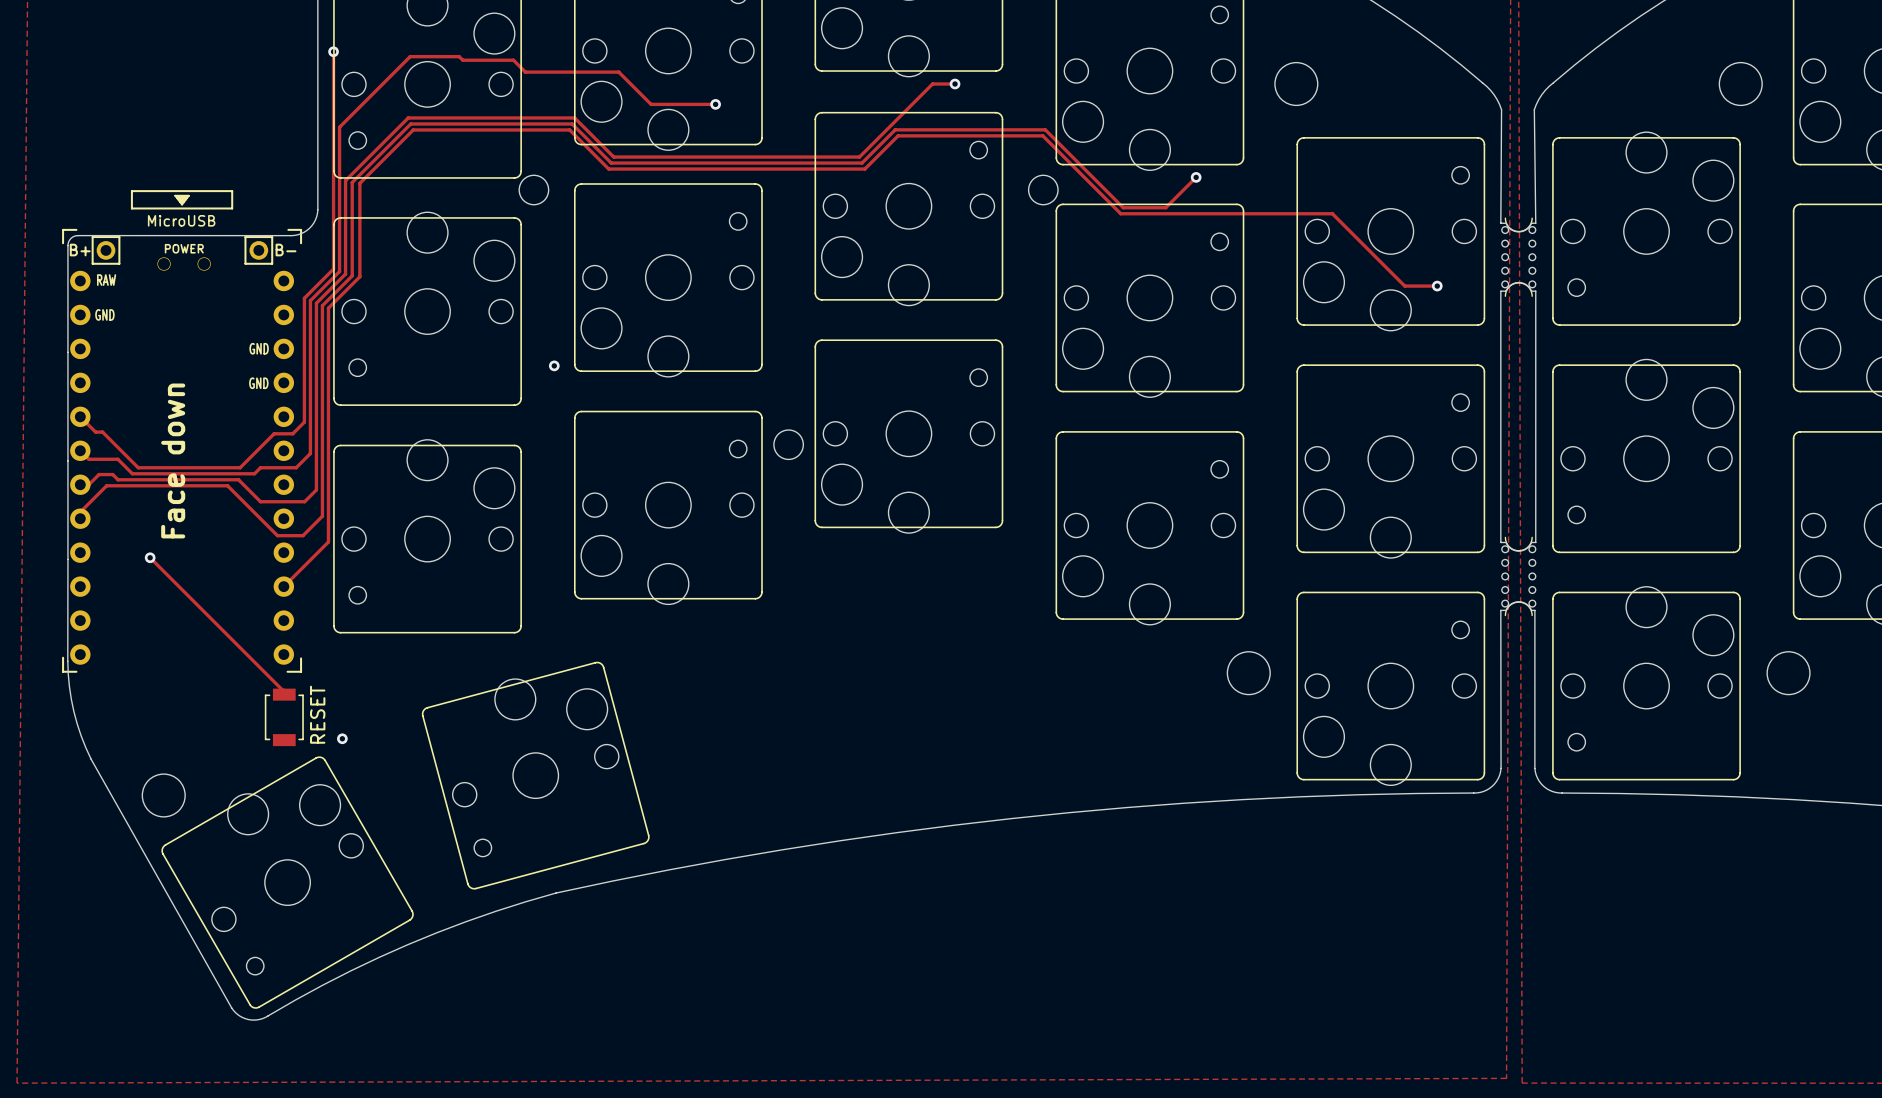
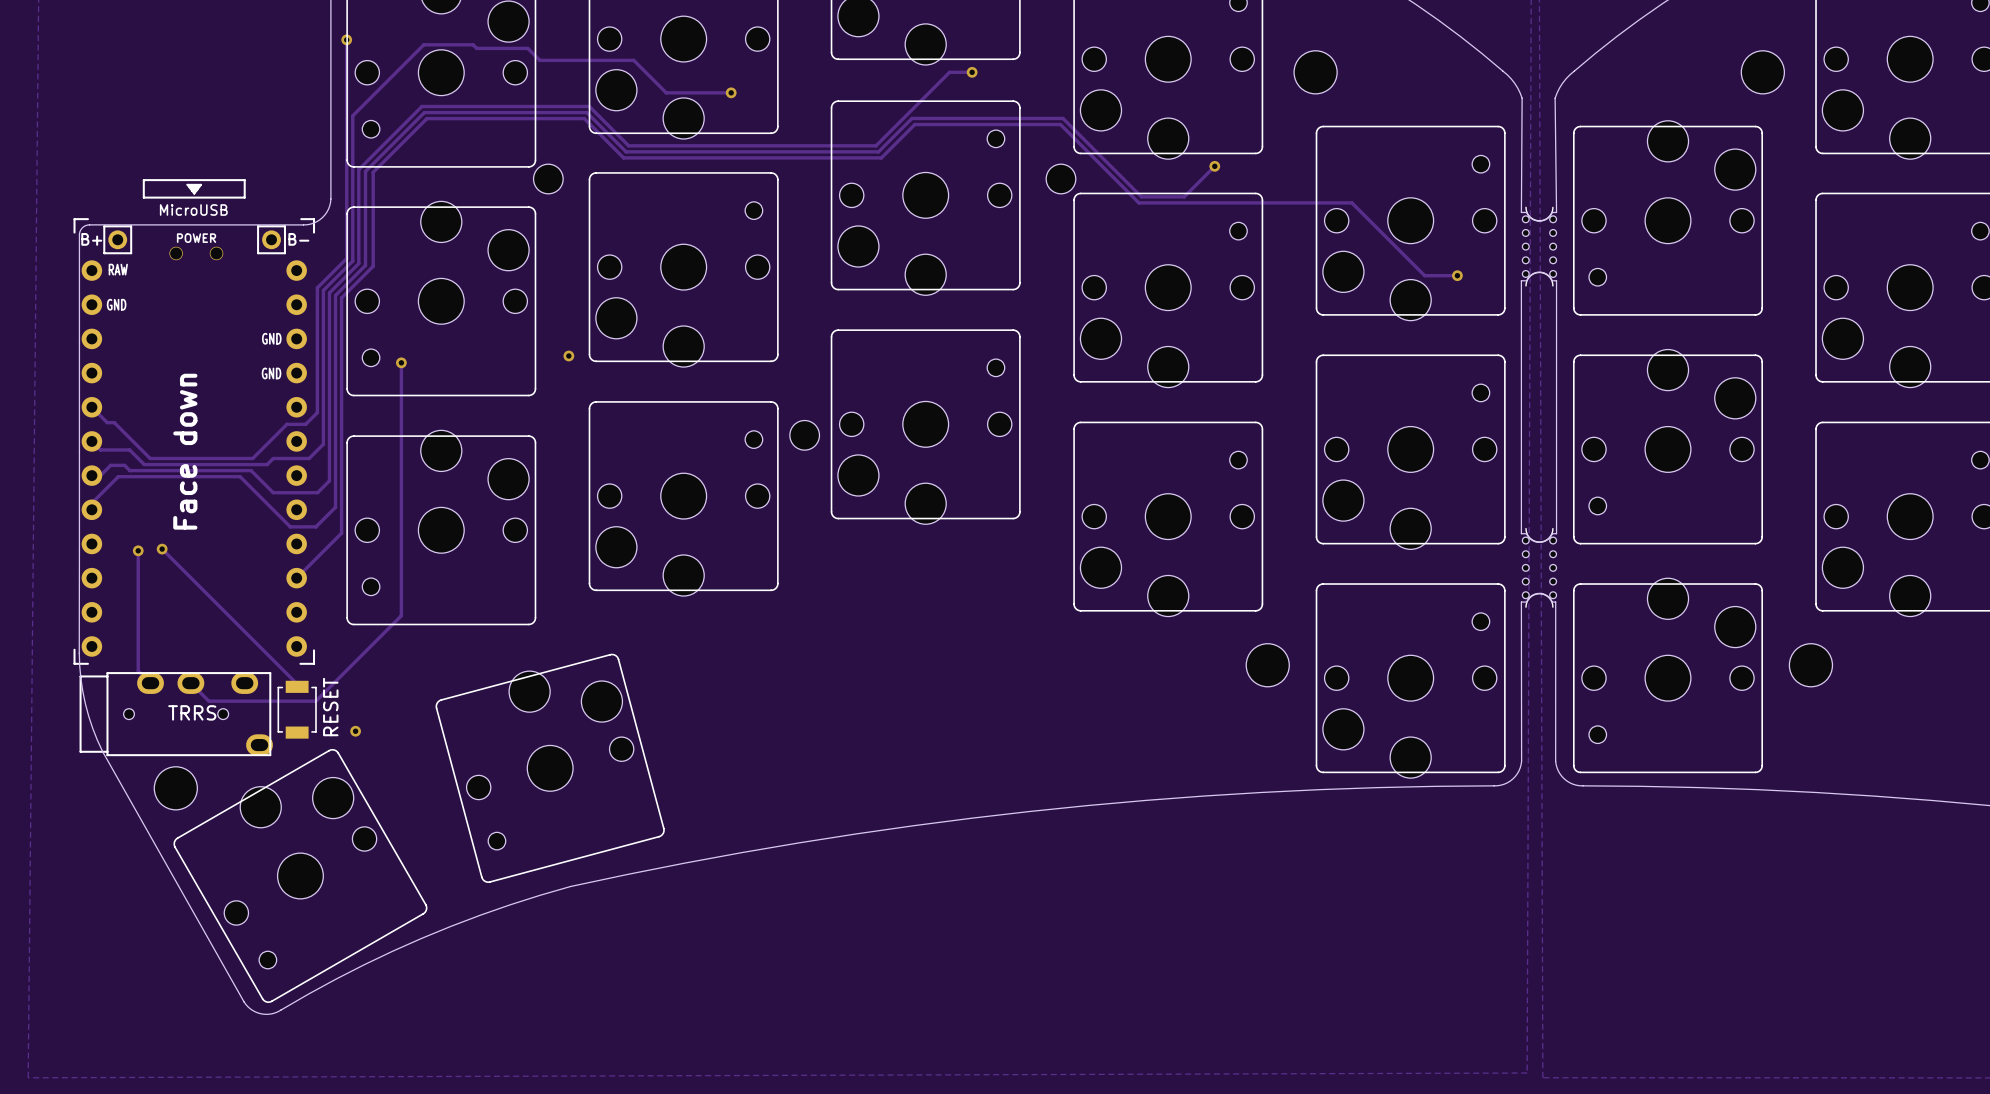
track: none -> (401, 362) (401, 615) (315, 701) (208, 701) (190, 683)
via: none -> (401, 362)
track: none -> (138, 550) (138, 670) (150, 683)
via: none -> (138, 550)
part: none -> (176, 714)

